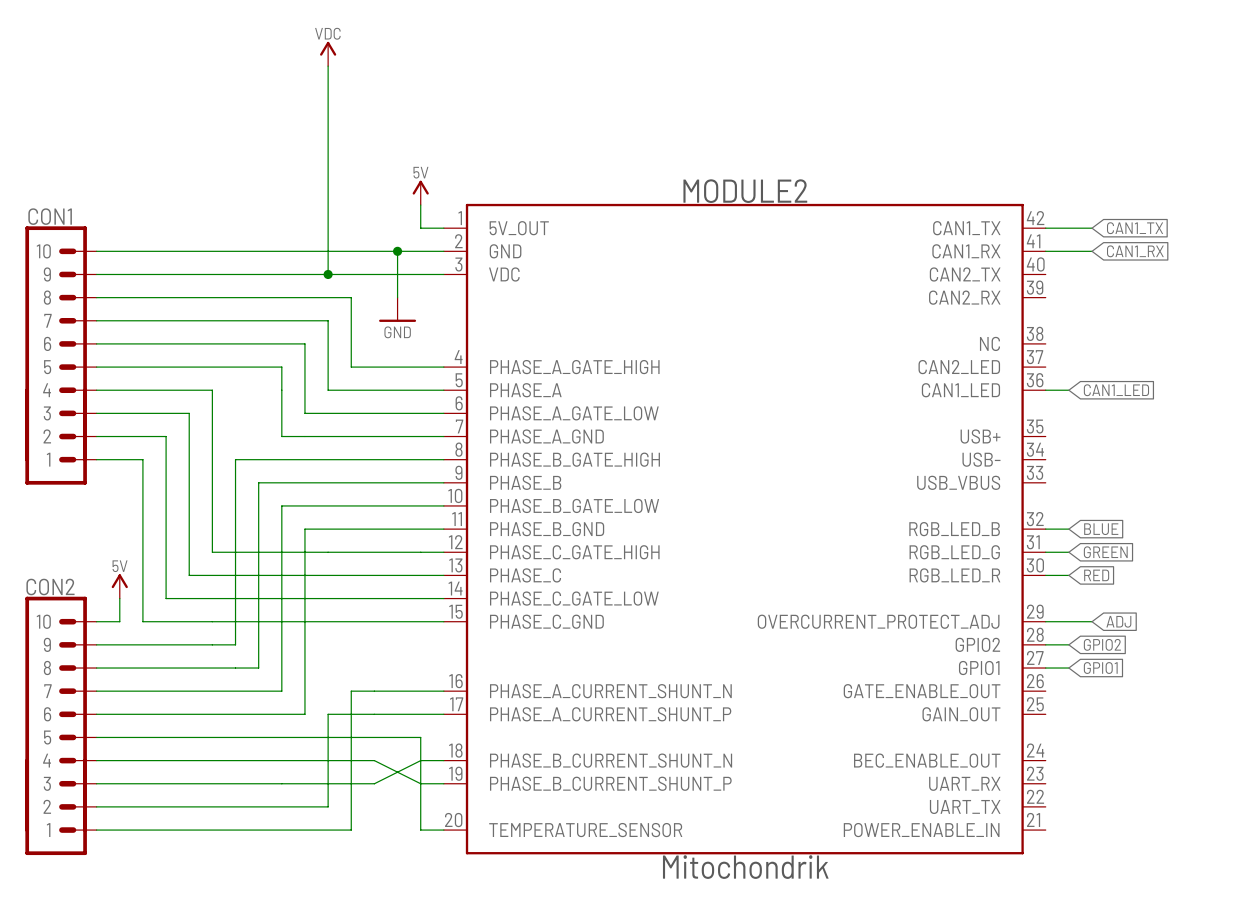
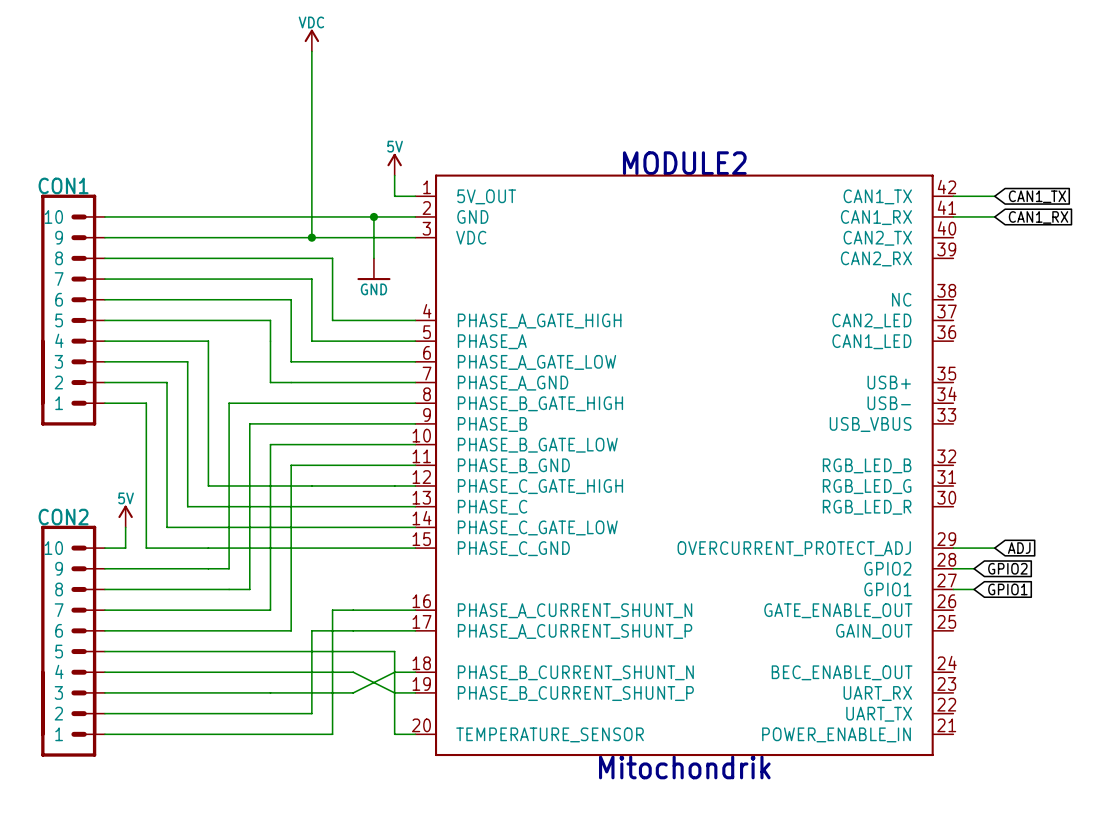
wire: (1045, 390) (1068, 390) -> none
global label: CAN1_LED (1116, 390) -> none
wire: (1045, 529) (1068, 529) -> none
global label: BLUE (1101, 529) -> none
wire: (1045, 552) (1068, 552) -> none
global label: GREEN (1105, 552) -> none
wire: (1045, 575) (1068, 575) -> none
global label: RED (1096, 575) -> none

